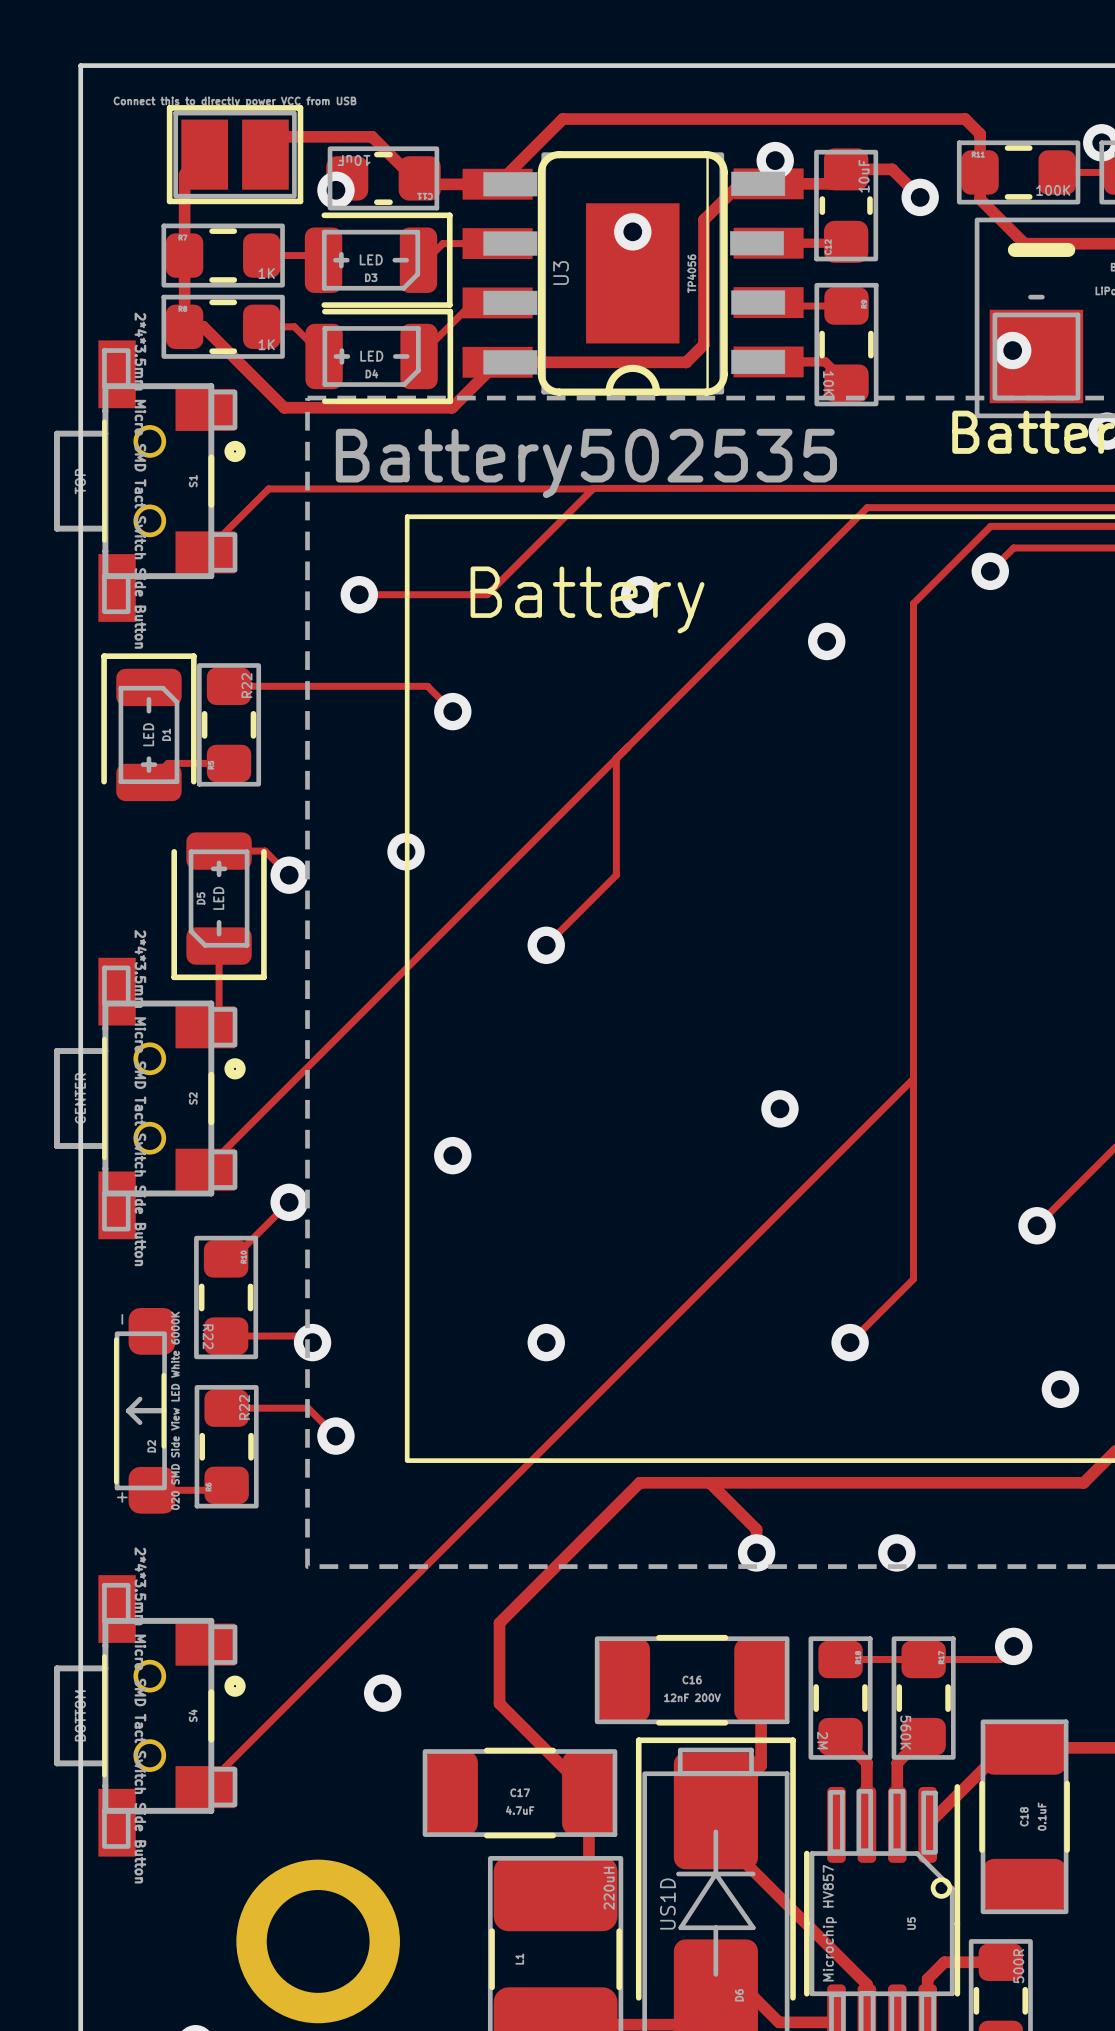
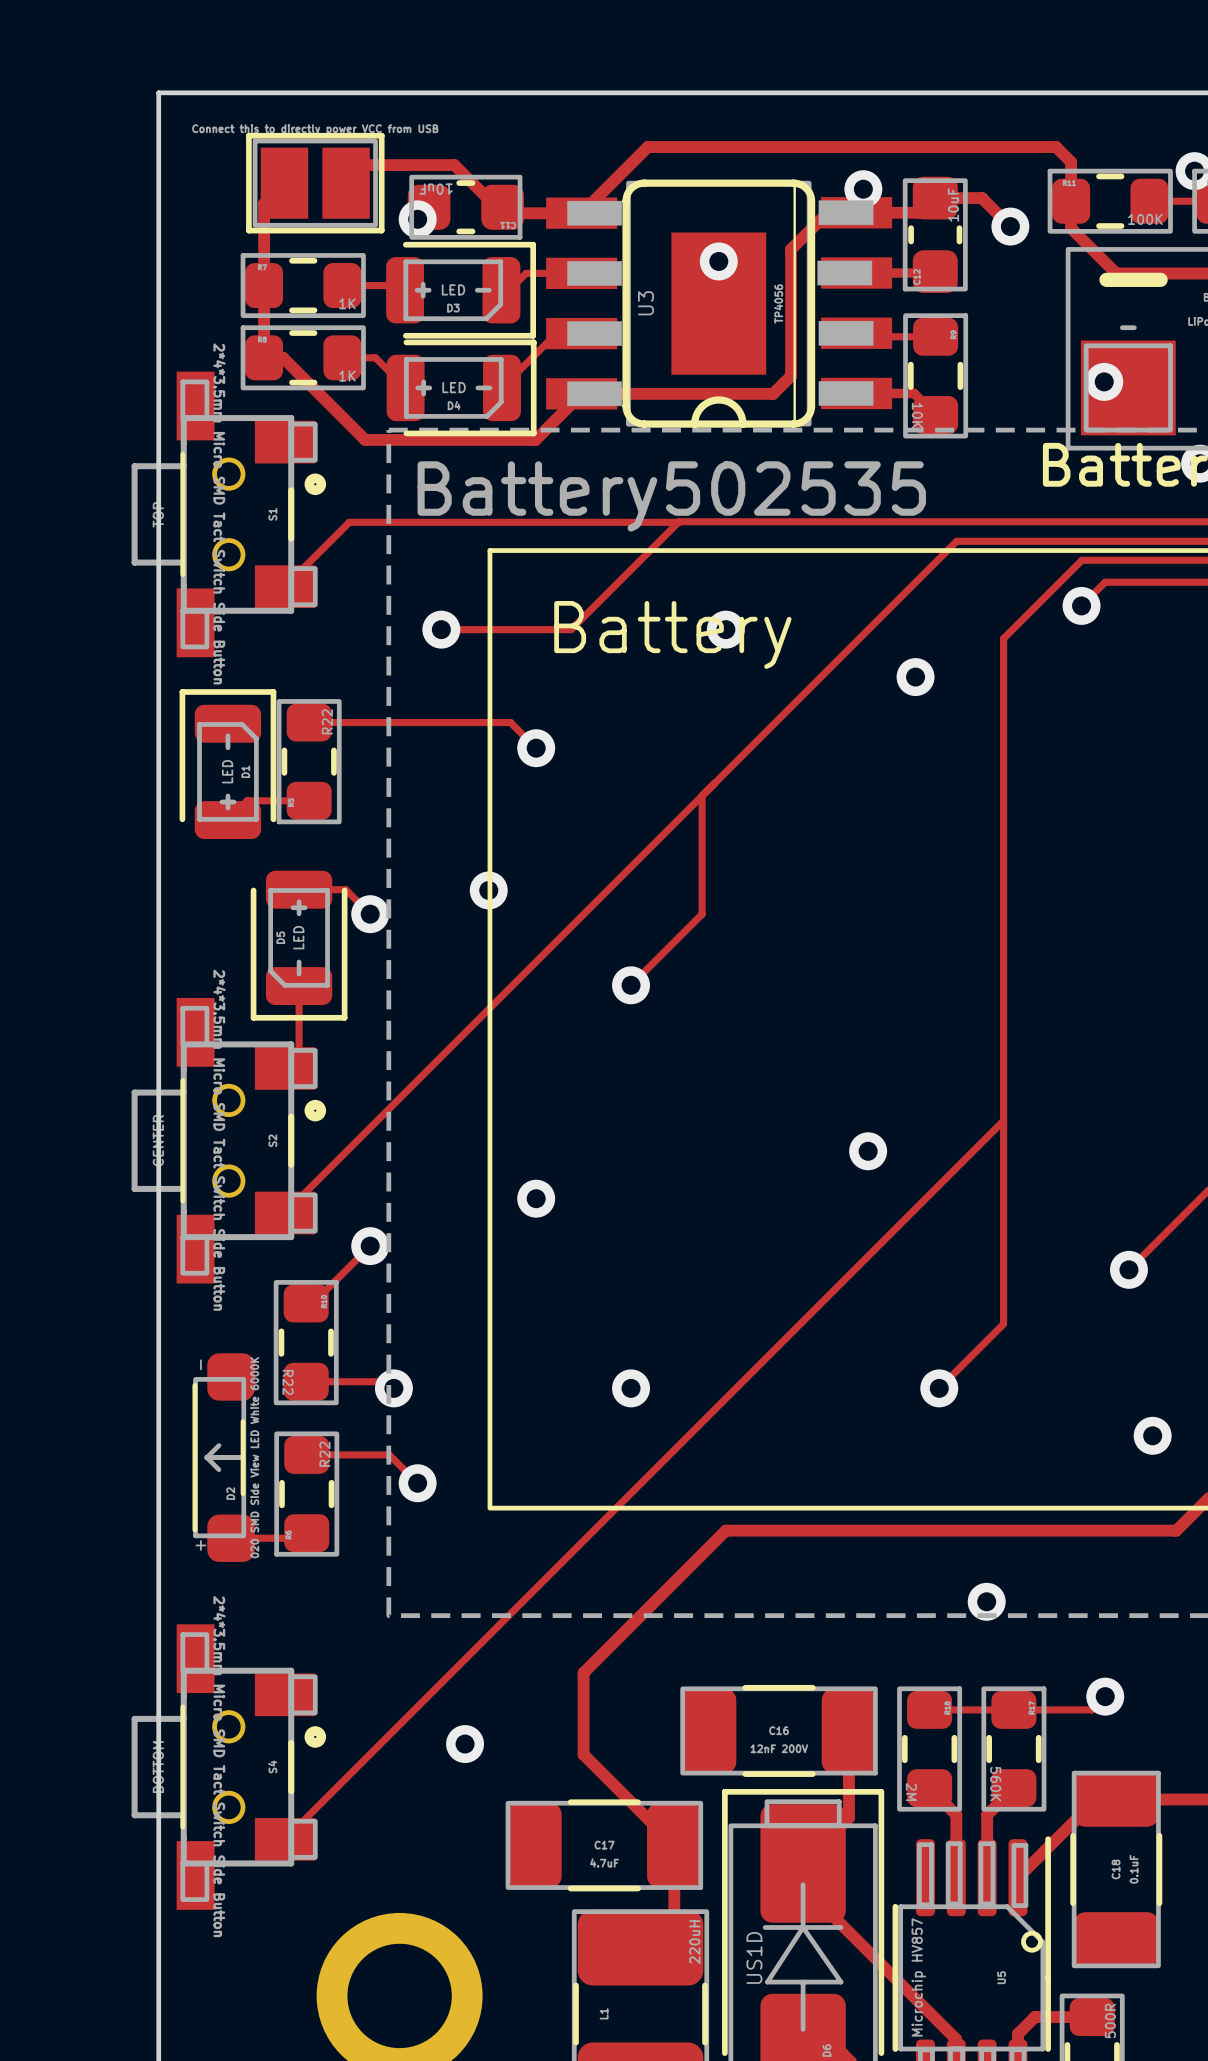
track: (709, 1482) (756, 1529) (756, 1552) -> none
via: (756, 1552) -> none

